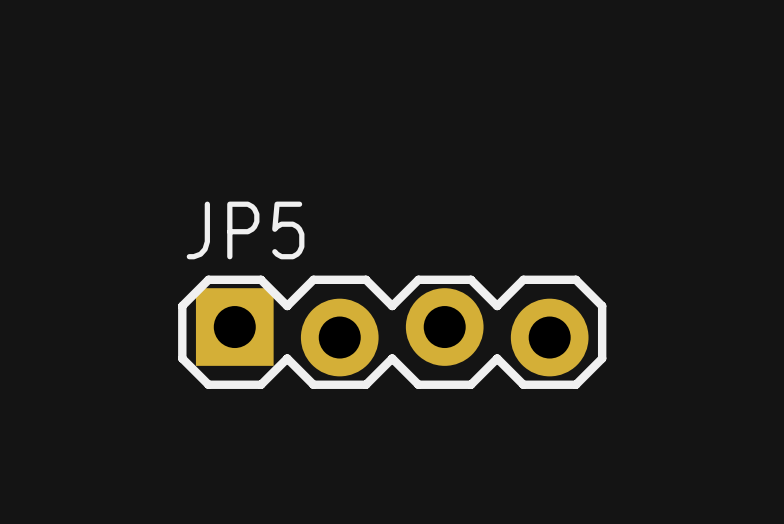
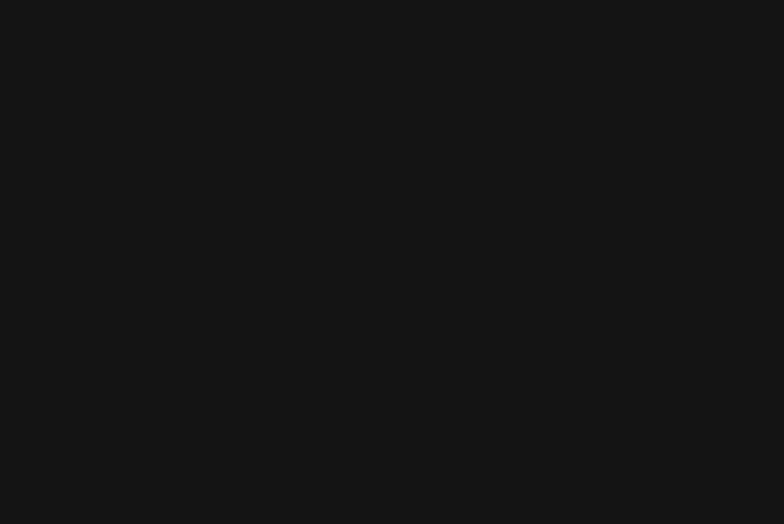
JP5: (392, 332) -> none

